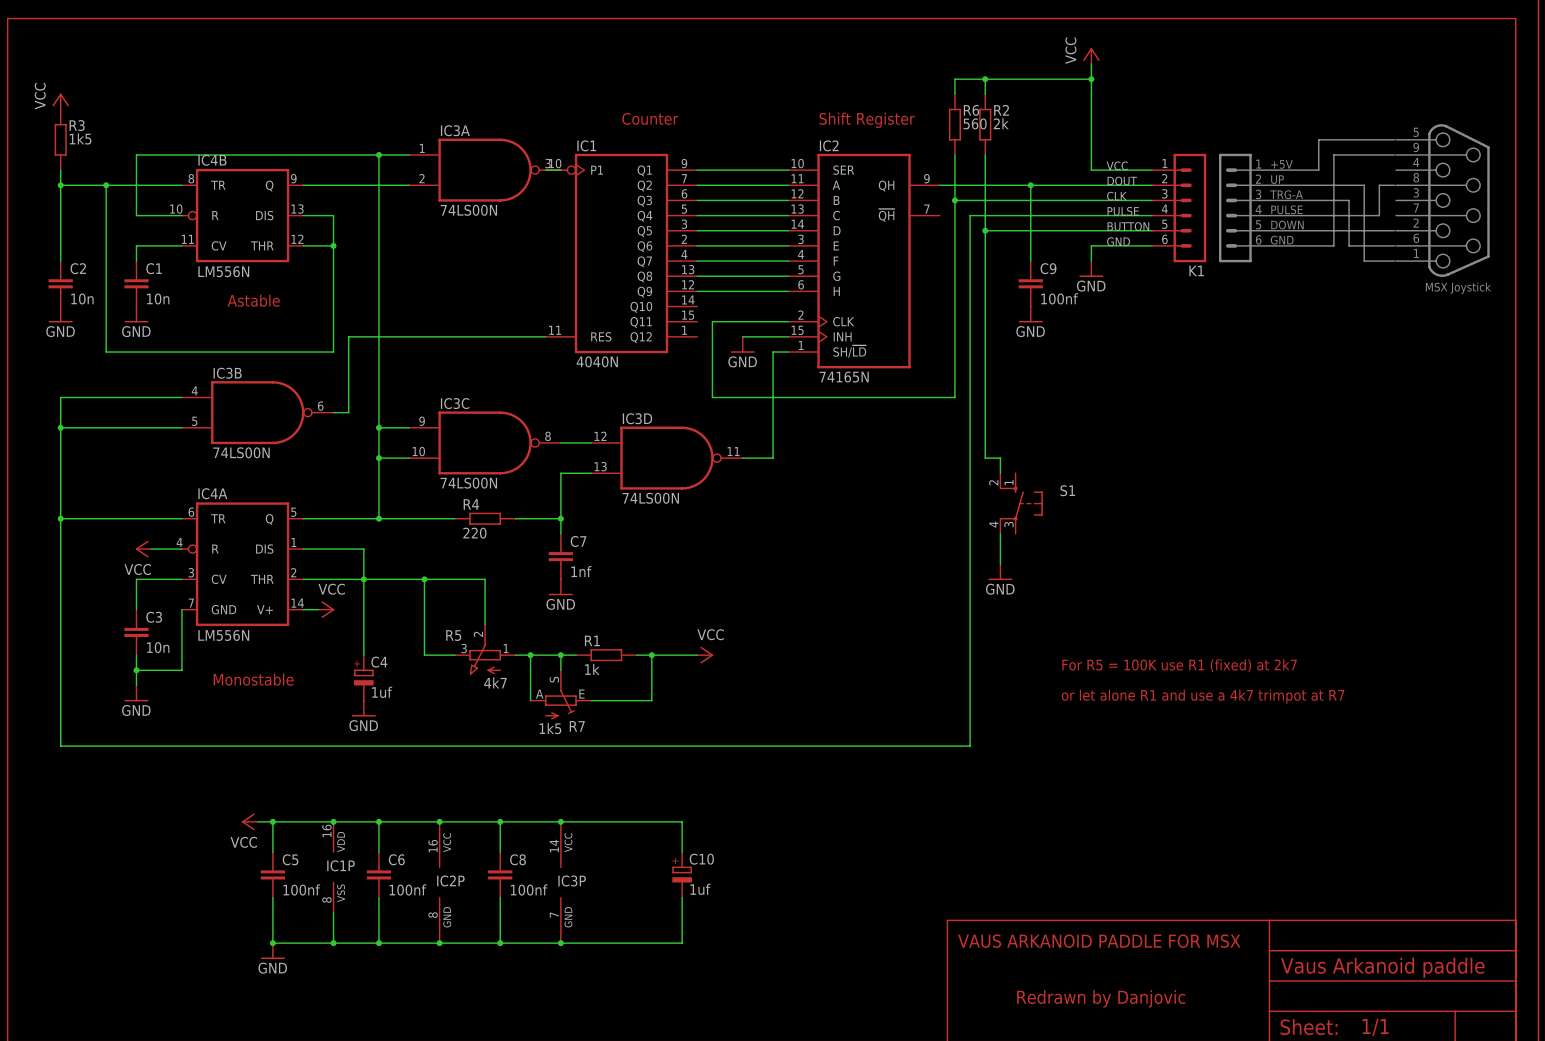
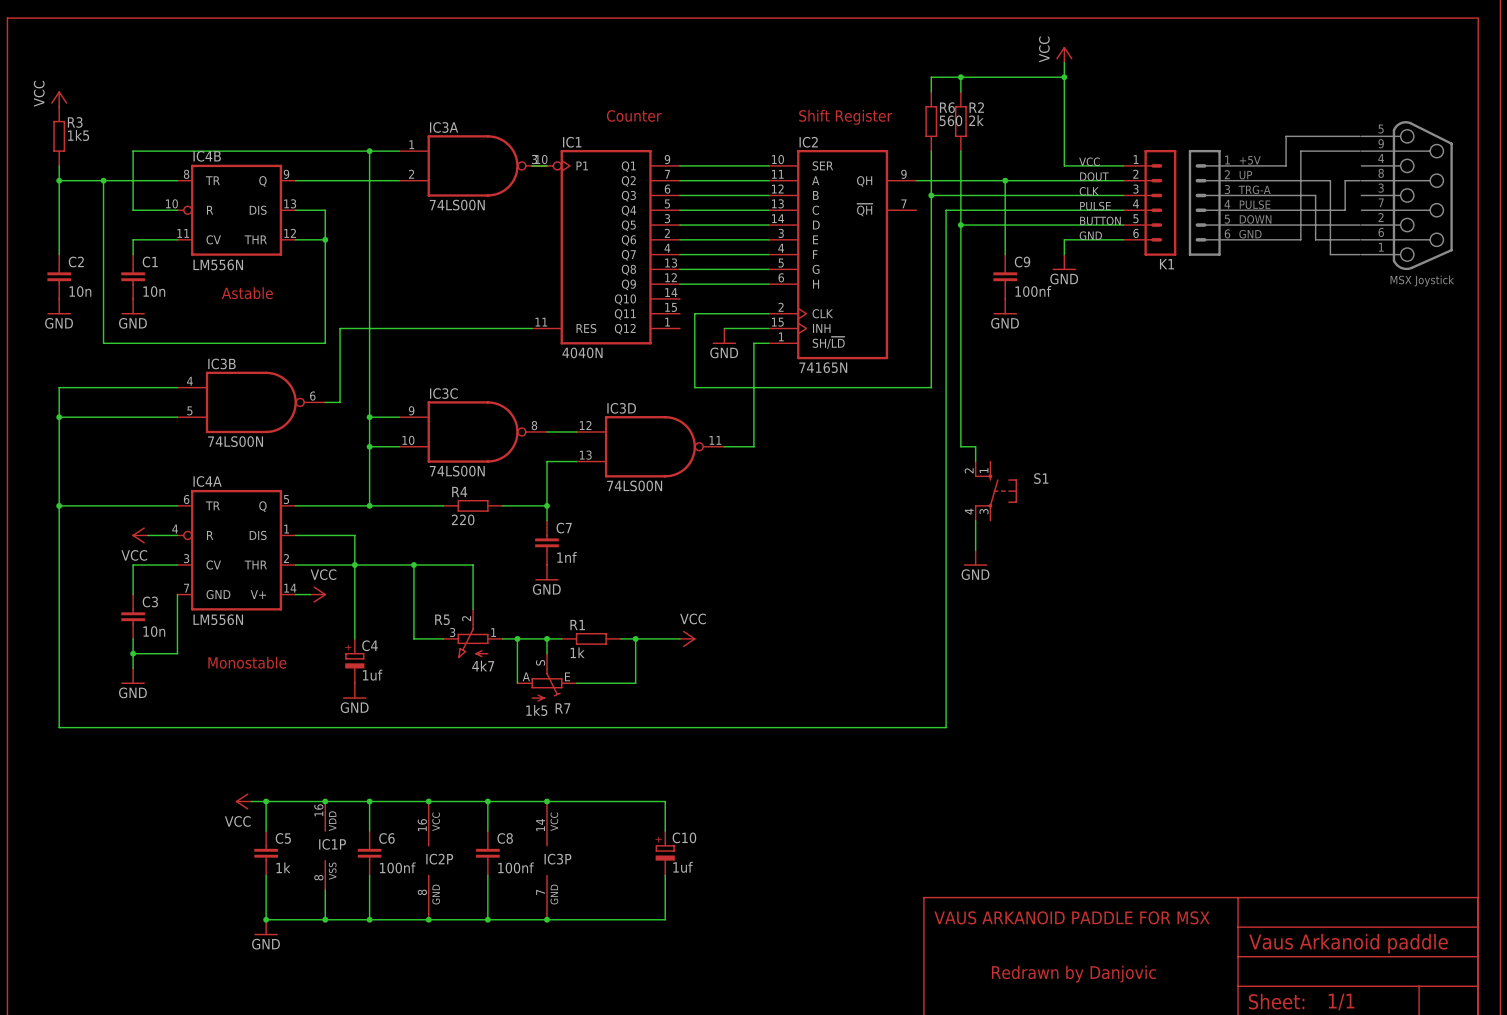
text: For R5 = 100K use R1 (fixed) at 2k7 (1179, 665) -> none
text: or let alone R1 and use a 4k7 trimpot at R7 (1203, 696) -> none
C5 value: 100nf (301, 889) -> 1k (283, 867)

